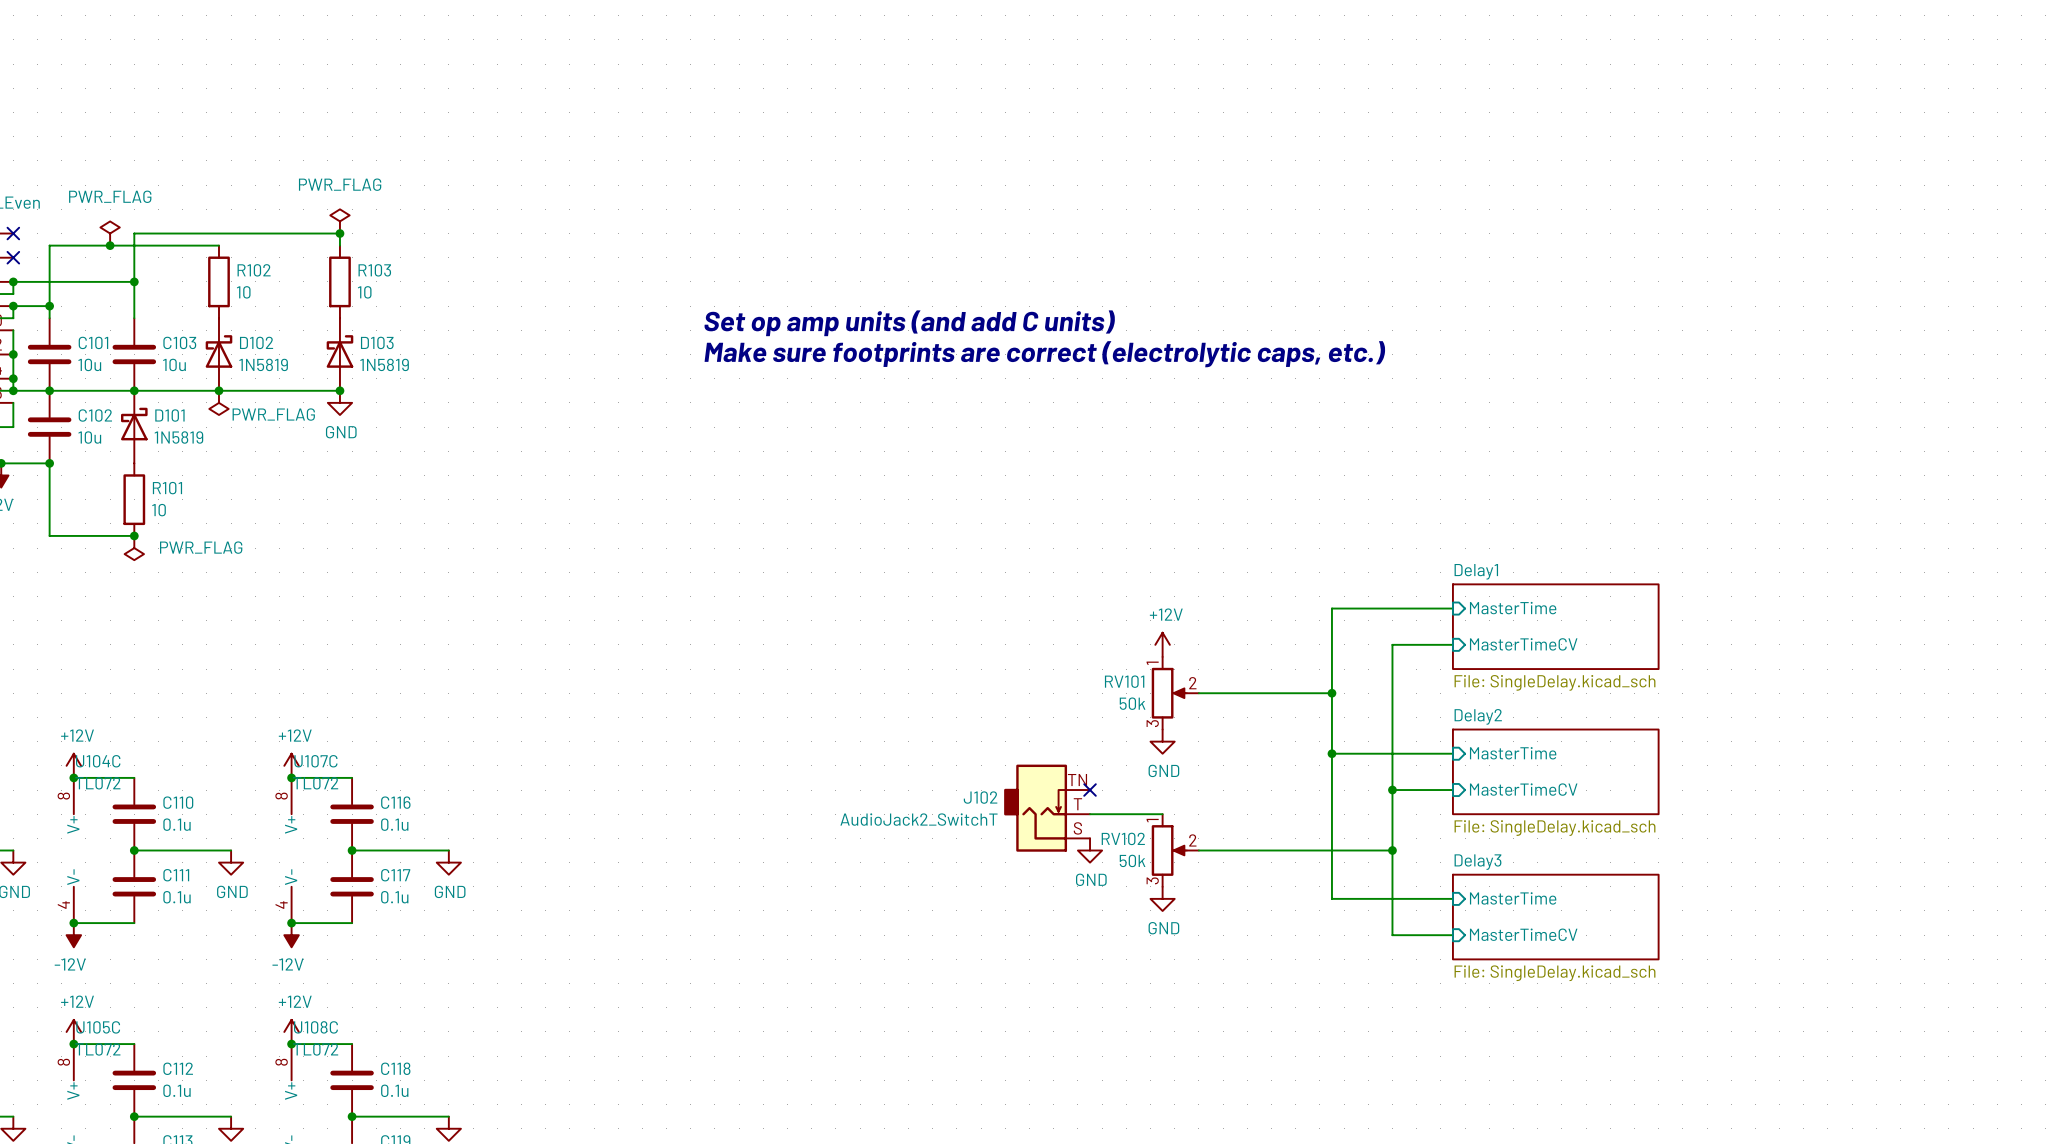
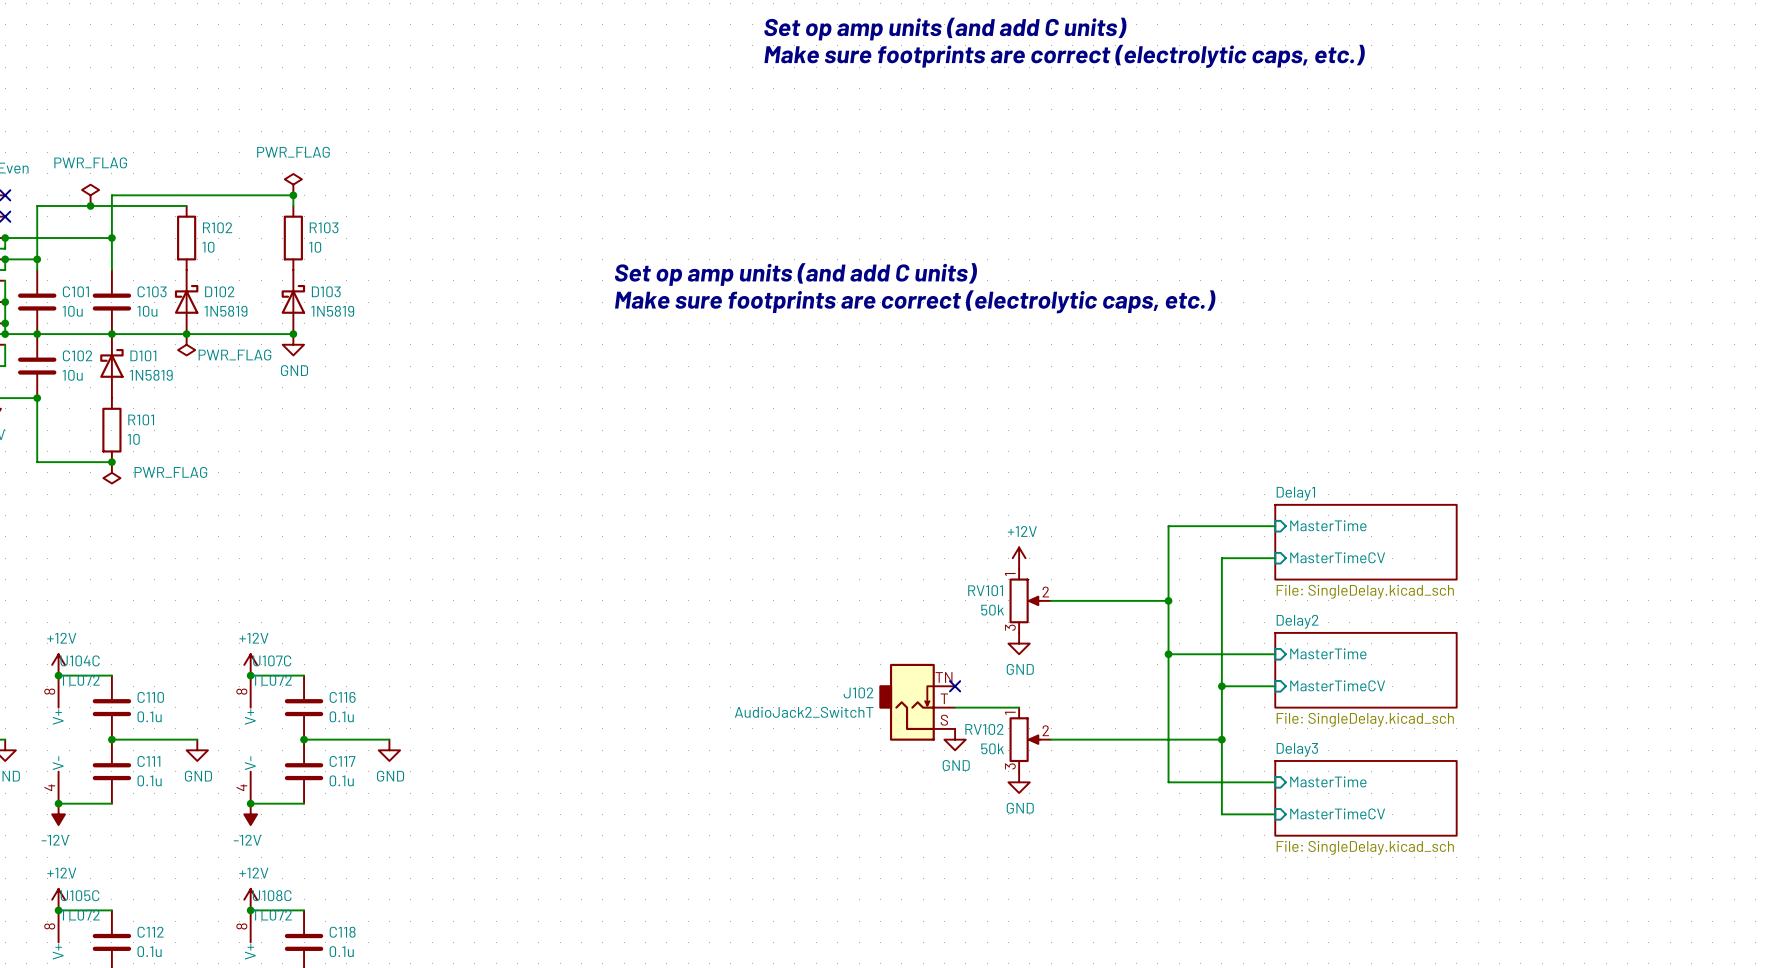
text: none -> Set op amp units (and add C units) (945, 29)
text: none -> Make sure footprints are correct (electrolytic caps, etc.) (1064, 56)

